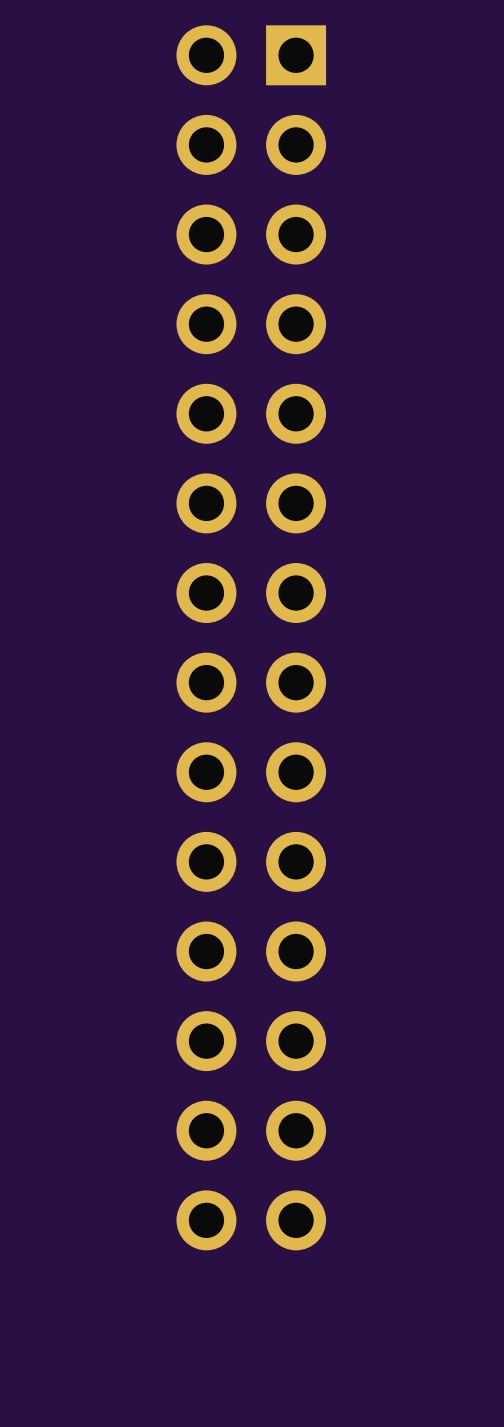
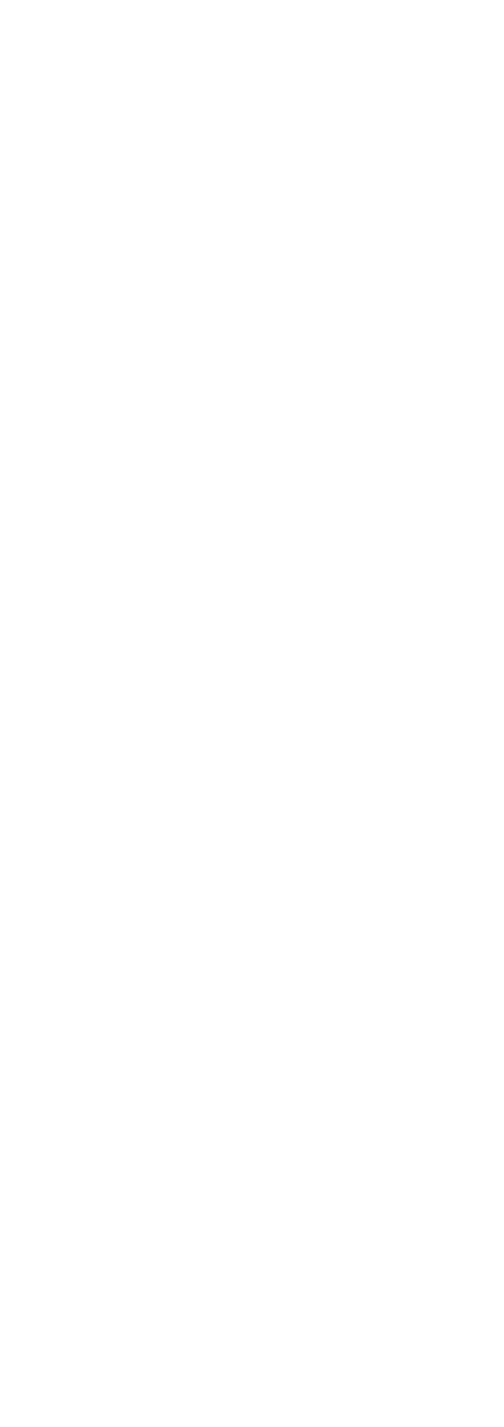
part: (251, 637) -> none

